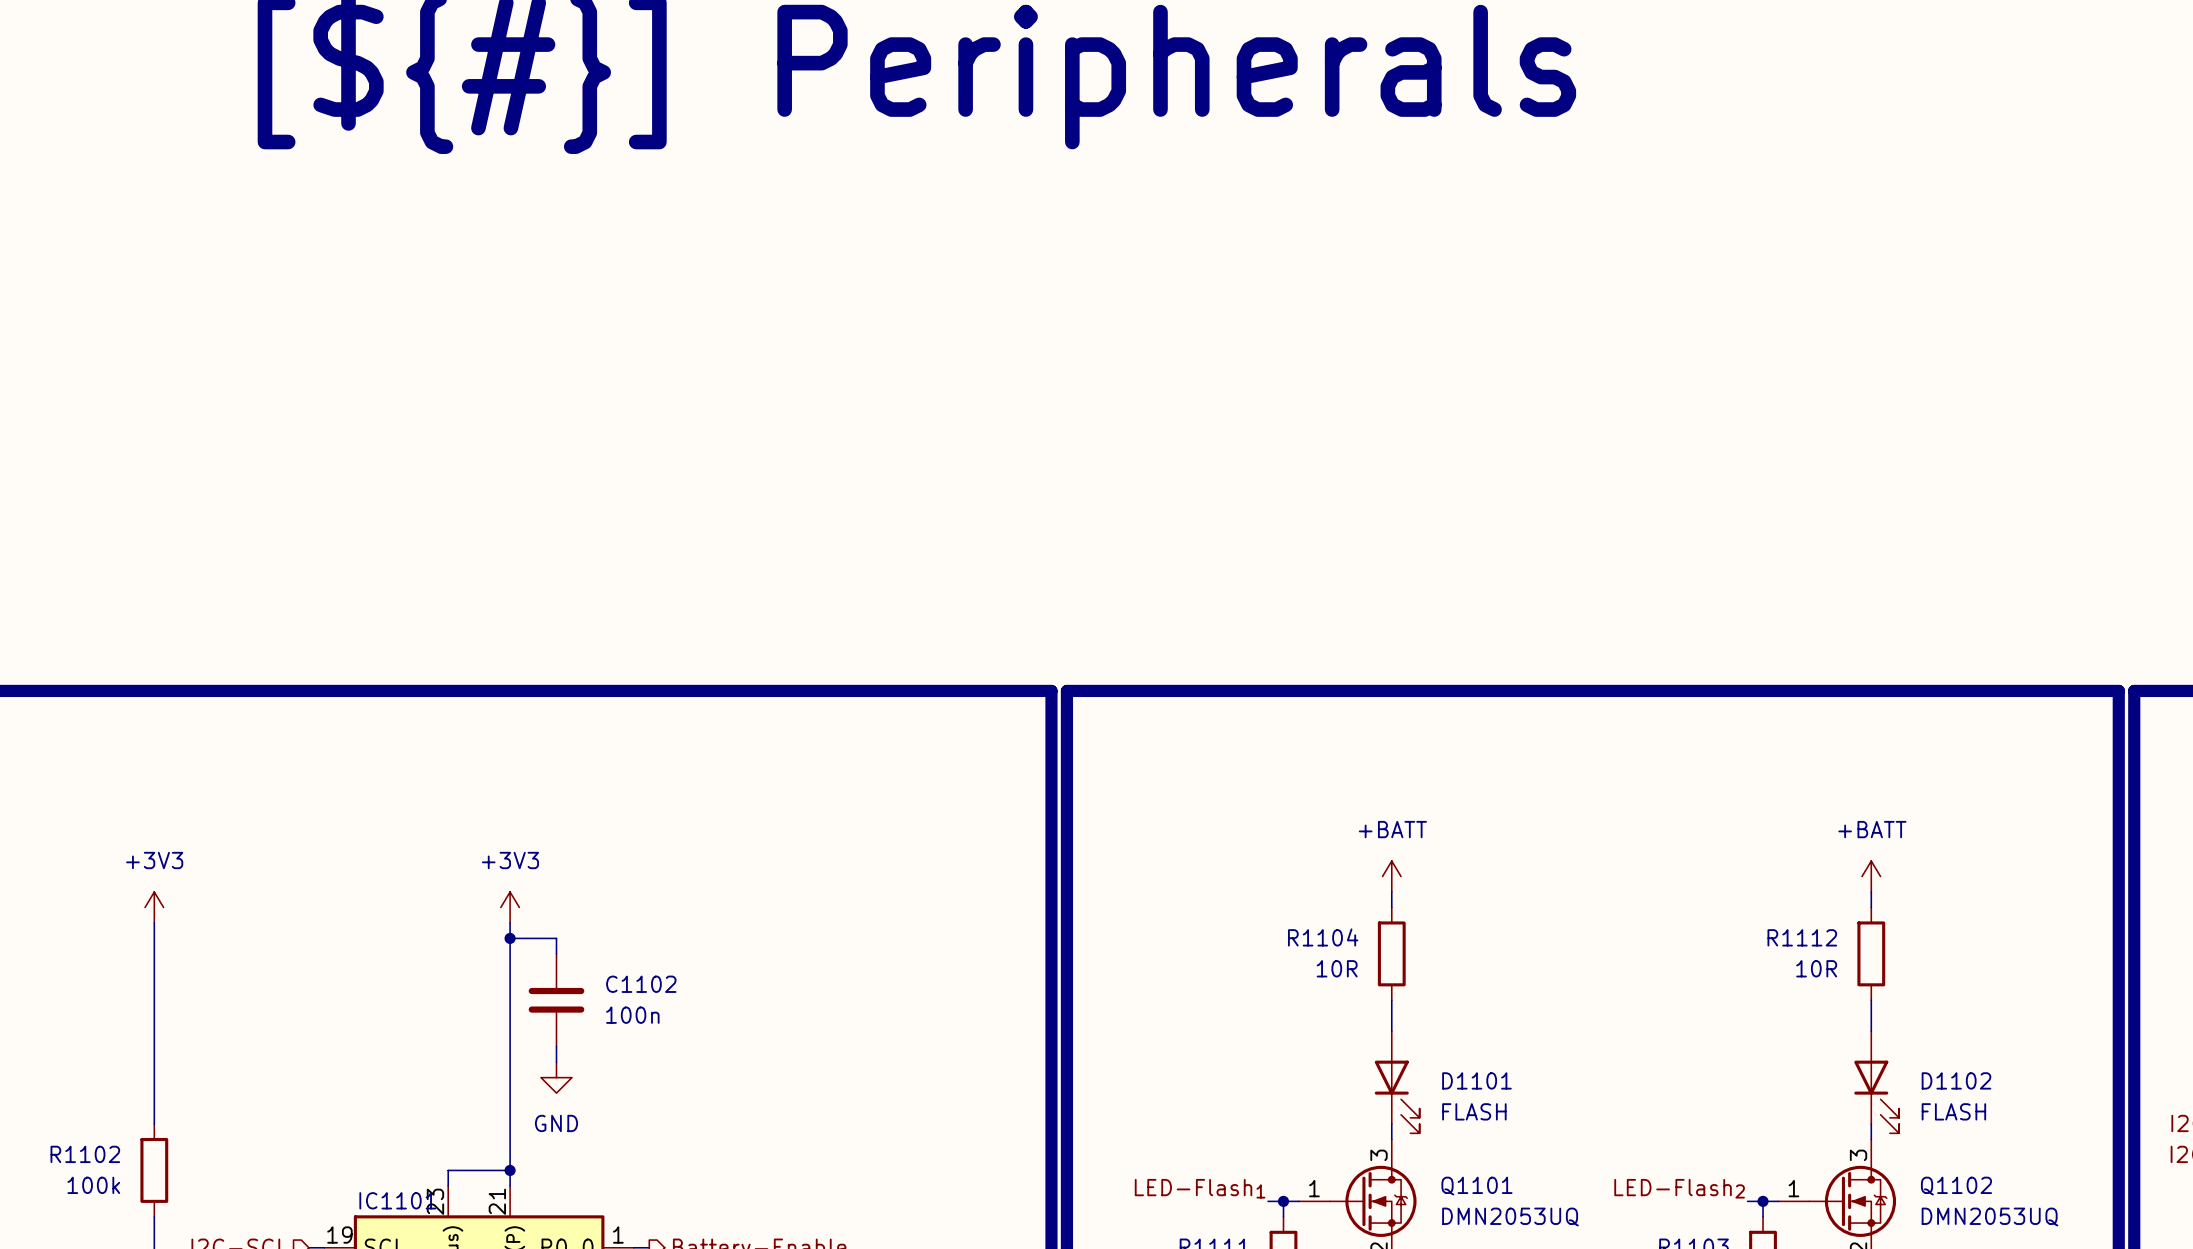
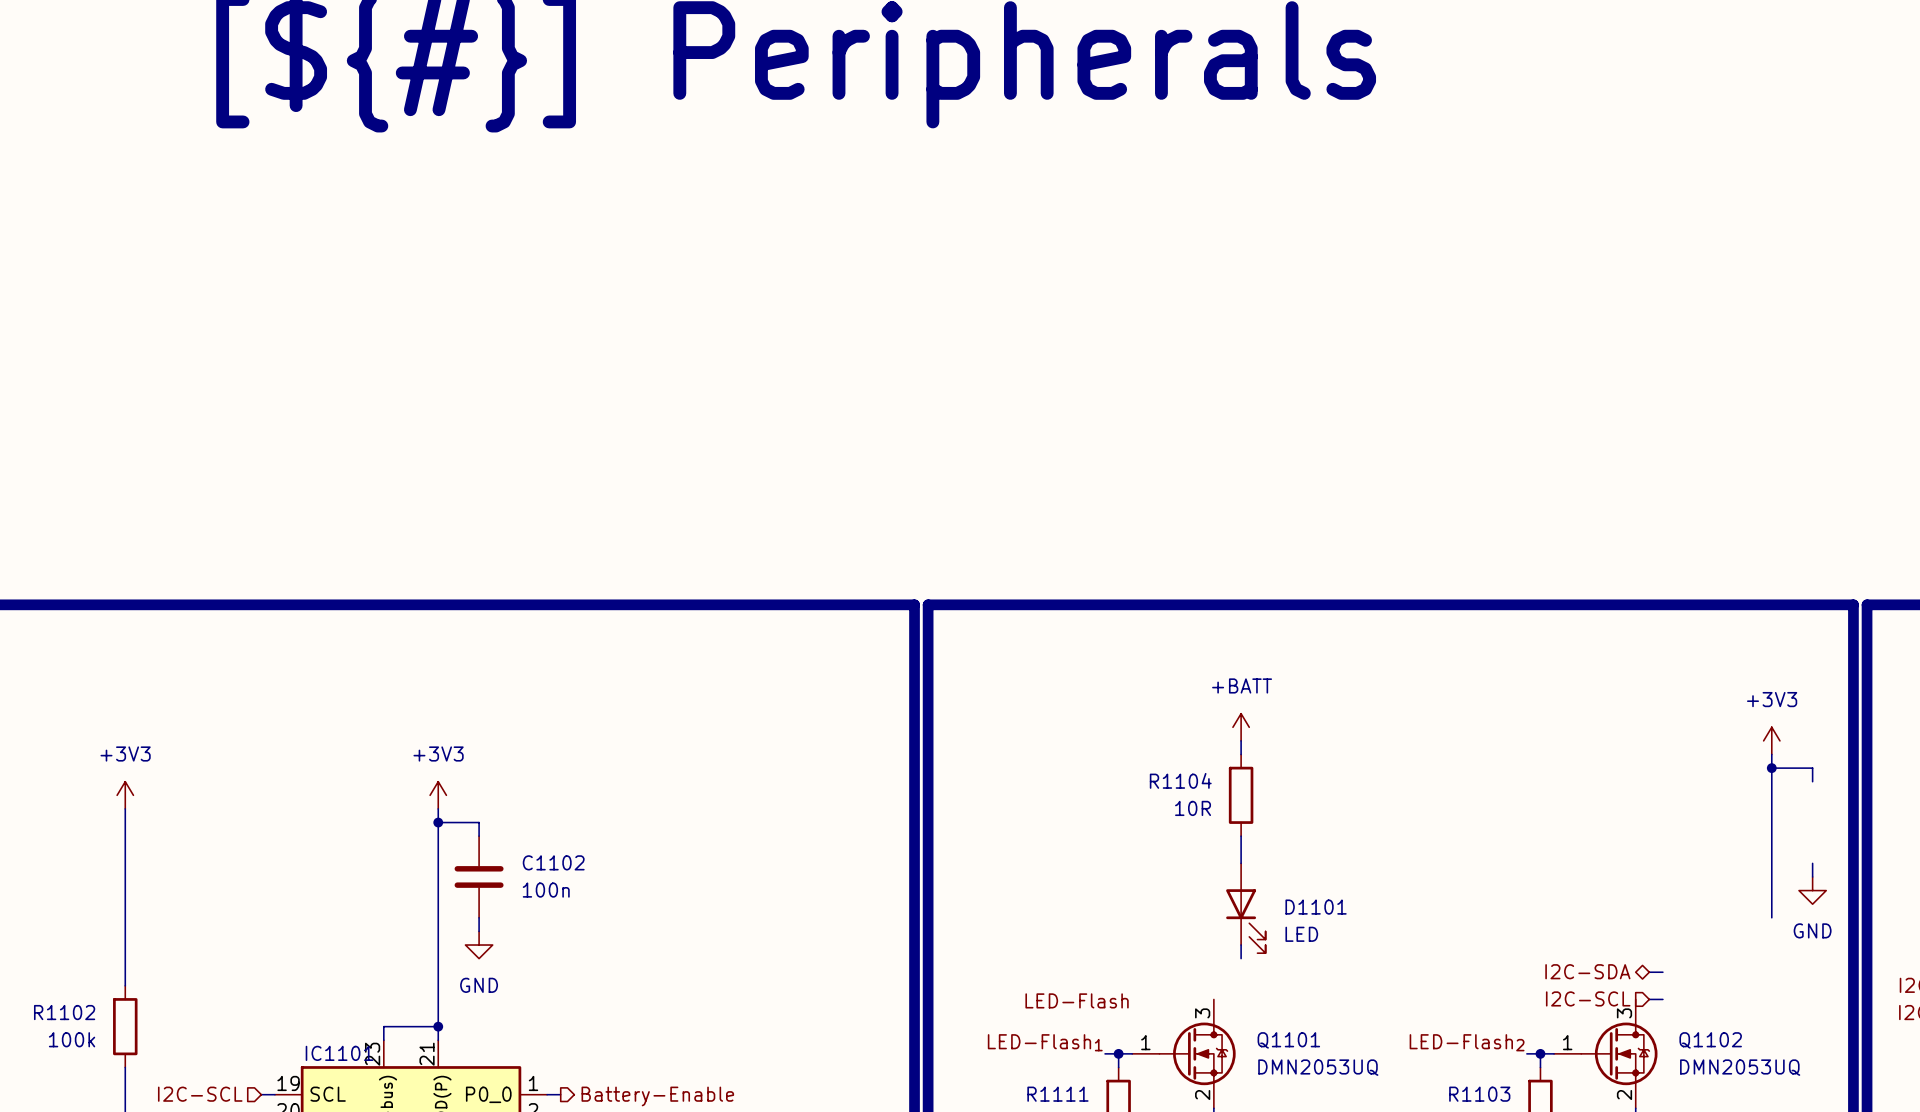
power symbol: none -> +3V3 (1771, 740)
wire: none -> (1771, 754) (1771, 917)
power symbol position: +BATT (1391, 876) -> +BATT (1241, 727)
power symbol: +BATT (1871, 876) -> none
wire: none -> (1771, 768) (1812, 768) (1812, 781)
junction: none -> (1771, 768)
wire: (1391, 892) (1391, 907) -> (1241, 740) (1241, 754)
wire: (1871, 892) (1871, 907) -> (1812, 863) (1812, 876)
R1104 position: (1391, 953) -> (1241, 795)
R1112: 10R (1871, 953) -> none
wire: (1391, 1000) (1391, 1031) -> (1241, 836) (1241, 863)
wire: (1871, 1000) (1871, 1031) -> none
power symbol: none -> GND (1812, 890)
D1101 position: (1397, 1082) -> (1245, 908)
D1102: FLASH (1876, 1082) -> none
hierarchical label: none -> I2C-SDA (1587, 971)
wire: none -> (1649, 972) (1662, 972)
D1101 value: FLASH (1474, 1111) -> LED (1301, 934)
wire: (1391, 1124) (1391, 1139) -> (1241, 945) (1241, 958)
hierarchical label: none -> I2C-SCL (1588, 998)
wire: none -> (1649, 999) (1662, 999)
label: none -> LED-Flash (1077, 1000)

